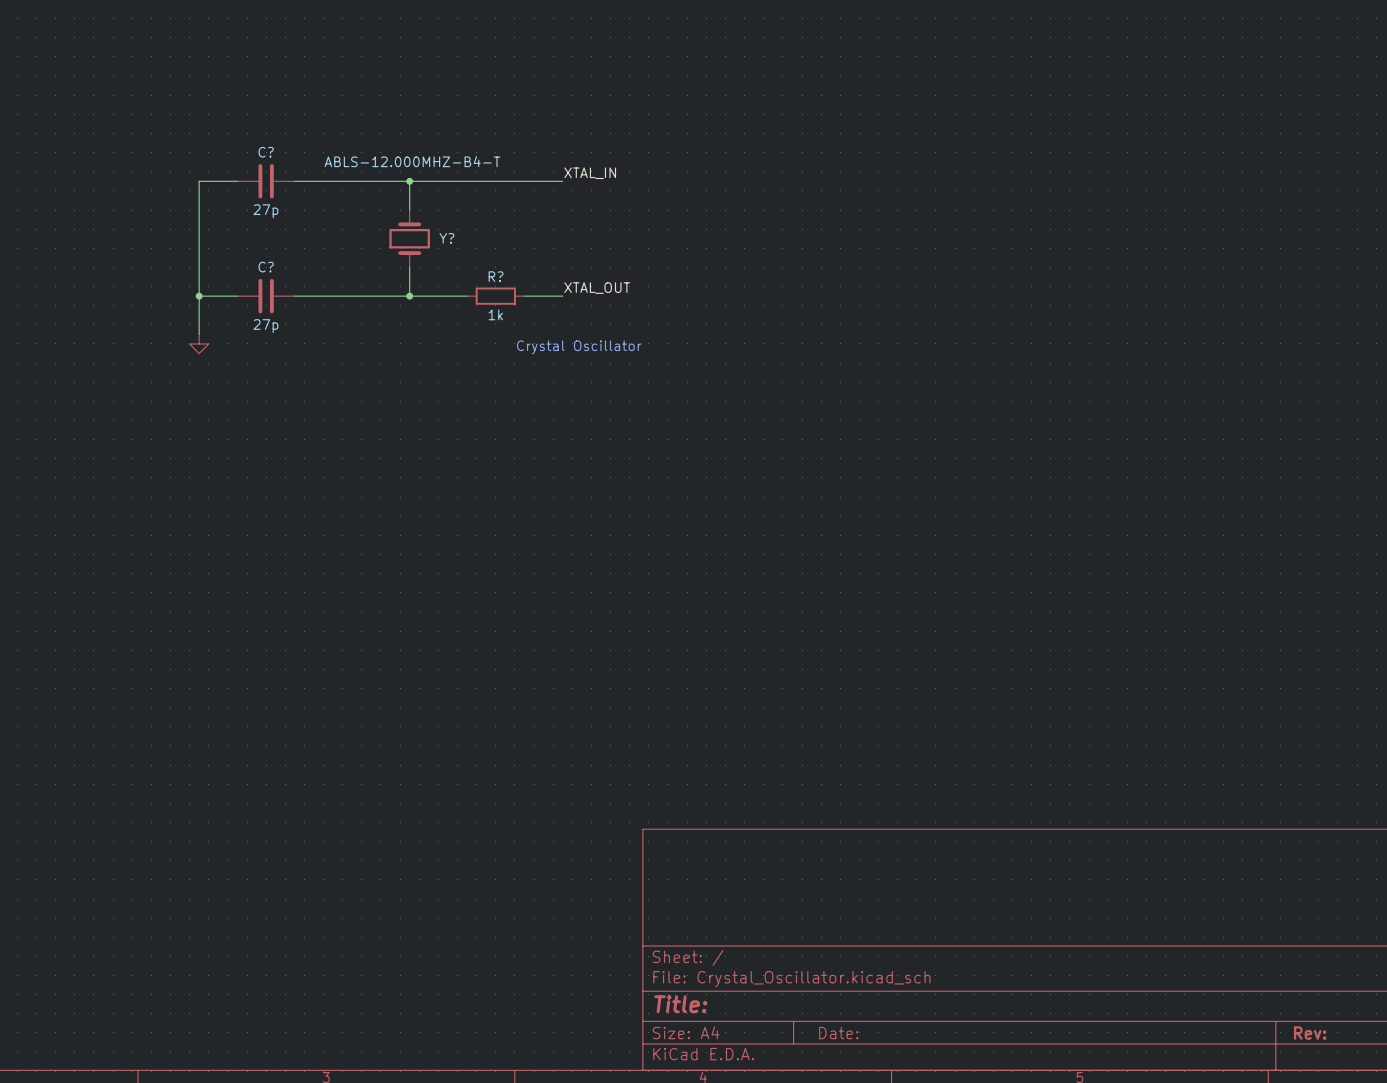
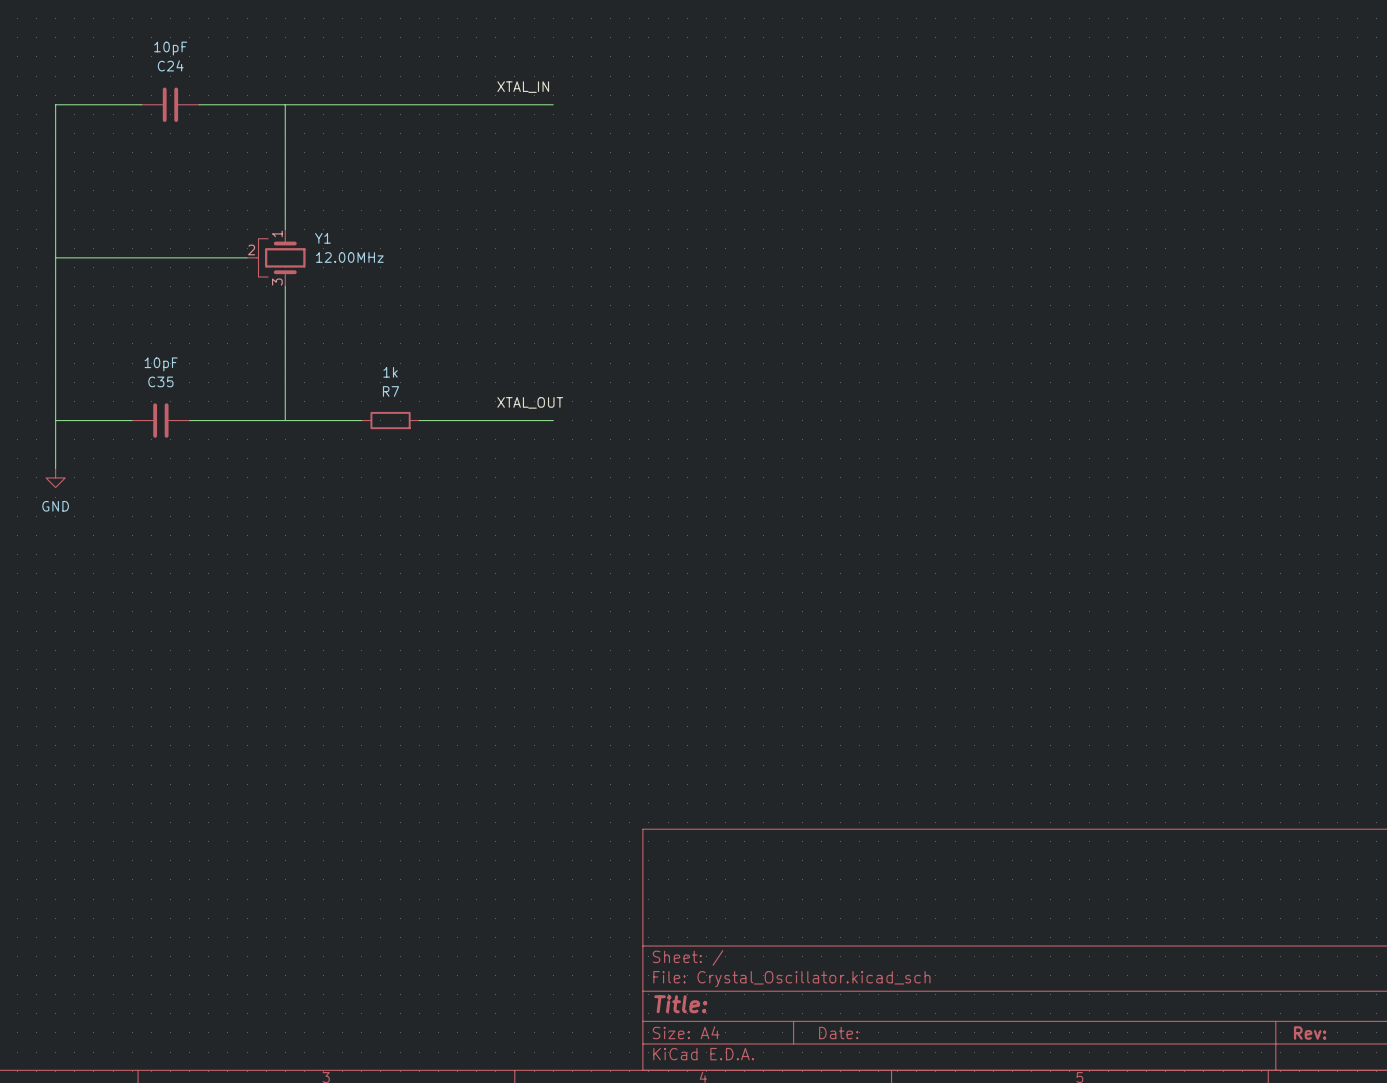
wire: none -> (141, 104) (55, 104) (55, 468)
10pF: none -> C24 (170, 104)
wire: none -> (199, 104) (553, 104)
wire: none -> (285, 104) (285, 229)
label position: XTAL_IN (590, 173) -> XTAL_IN (523, 87)
wire: (237, 181) (199, 181) (199, 334) -> none
C?: 27p (266, 181) -> none
wire: (294, 181) (562, 181) -> none
wire: (409, 181) (409, 210) -> none
junction: (409, 181) -> none
Y?: ABLS-12.000MHZ-B4-T (409, 238) -> none
wire: none -> (55, 257) (247, 257)
Y1: none -> 12.00MHz (276, 257)
wire: (409, 267) (409, 296) -> none
wire: none -> (285, 286) (285, 420)
label position: XTAL_OUT (597, 288) -> XTAL_OUT (530, 402)
wire: (199, 296) (237, 296) -> none
junction: (199, 296) -> none
C?: 27p (266, 296) -> none
wire: (294, 296) (467, 296) -> (189, 420) (361, 420)
junction: (409, 296) -> none
R?: 1k (495, 296) -> none
wire: (524, 296) (562, 296) -> none
power symbol: (199, 343) -> none
text: Crystal Oscillator (579, 347) -> none
wire: none -> (55, 420) (132, 420)
10pF: none -> C35 (160, 420)
1k: none -> R7 (390, 420)
wire: none -> (419, 420) (553, 420)
power symbol: none -> GND (55, 477)

